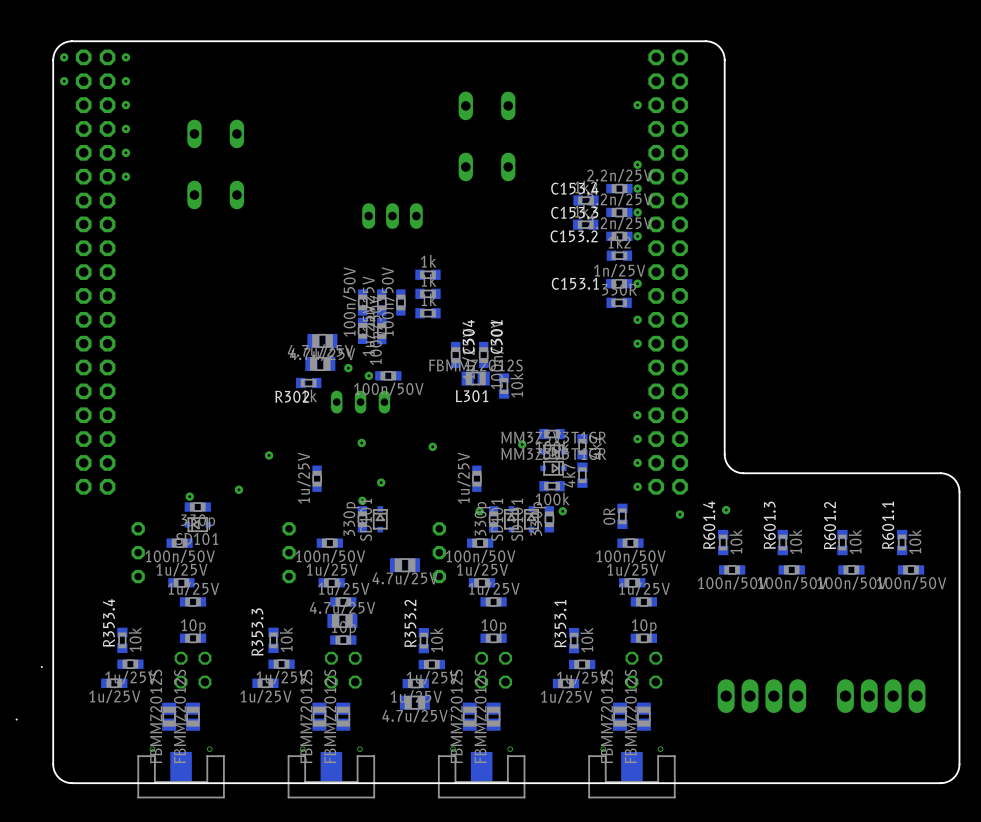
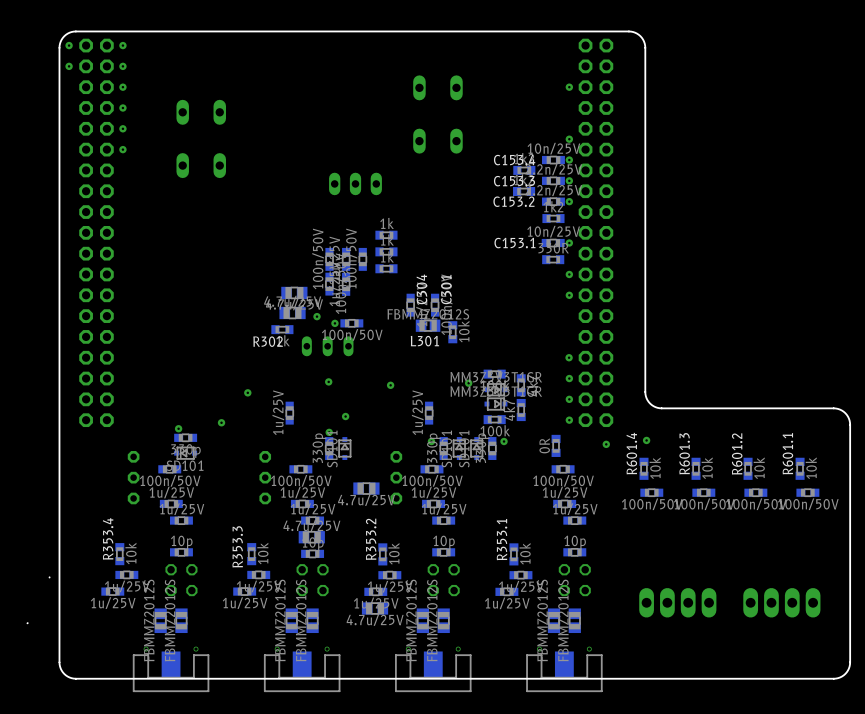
C153.4 value: 2.2n/25V (619, 175) -> 10n/25V (553, 148)
C153.1 value: 1n/25V (619, 270) -> 10n/25V (553, 231)

